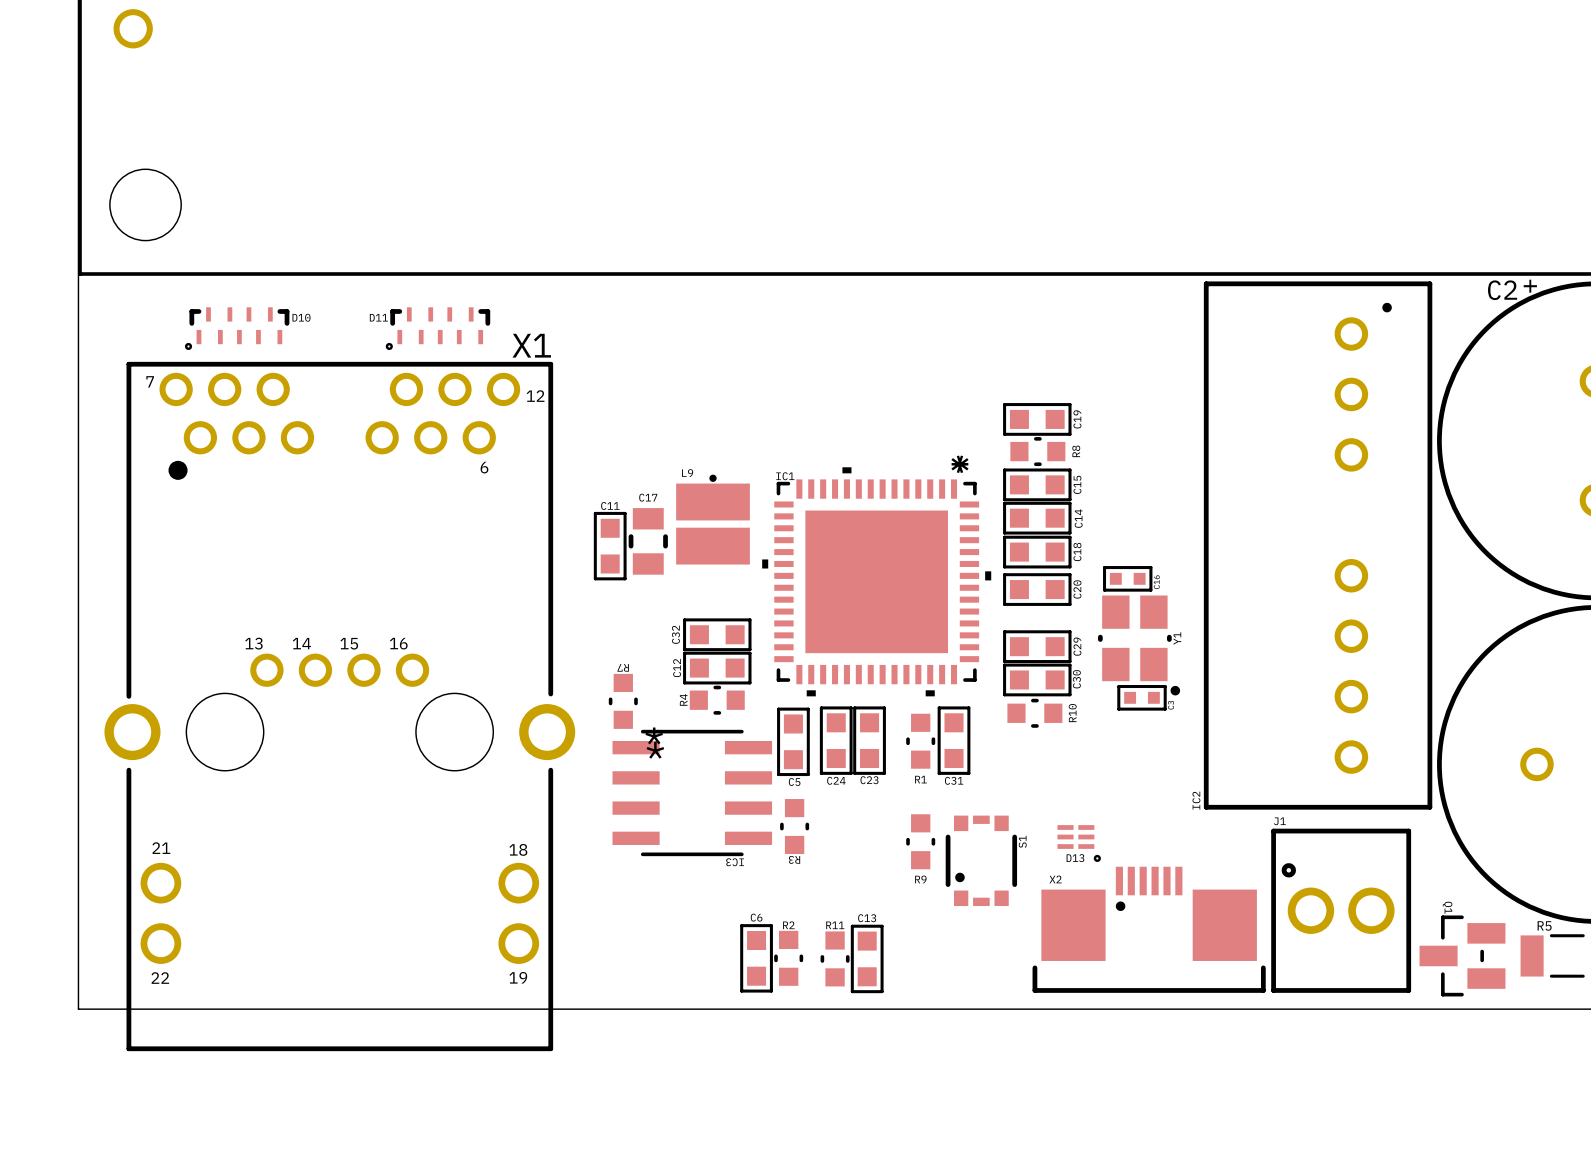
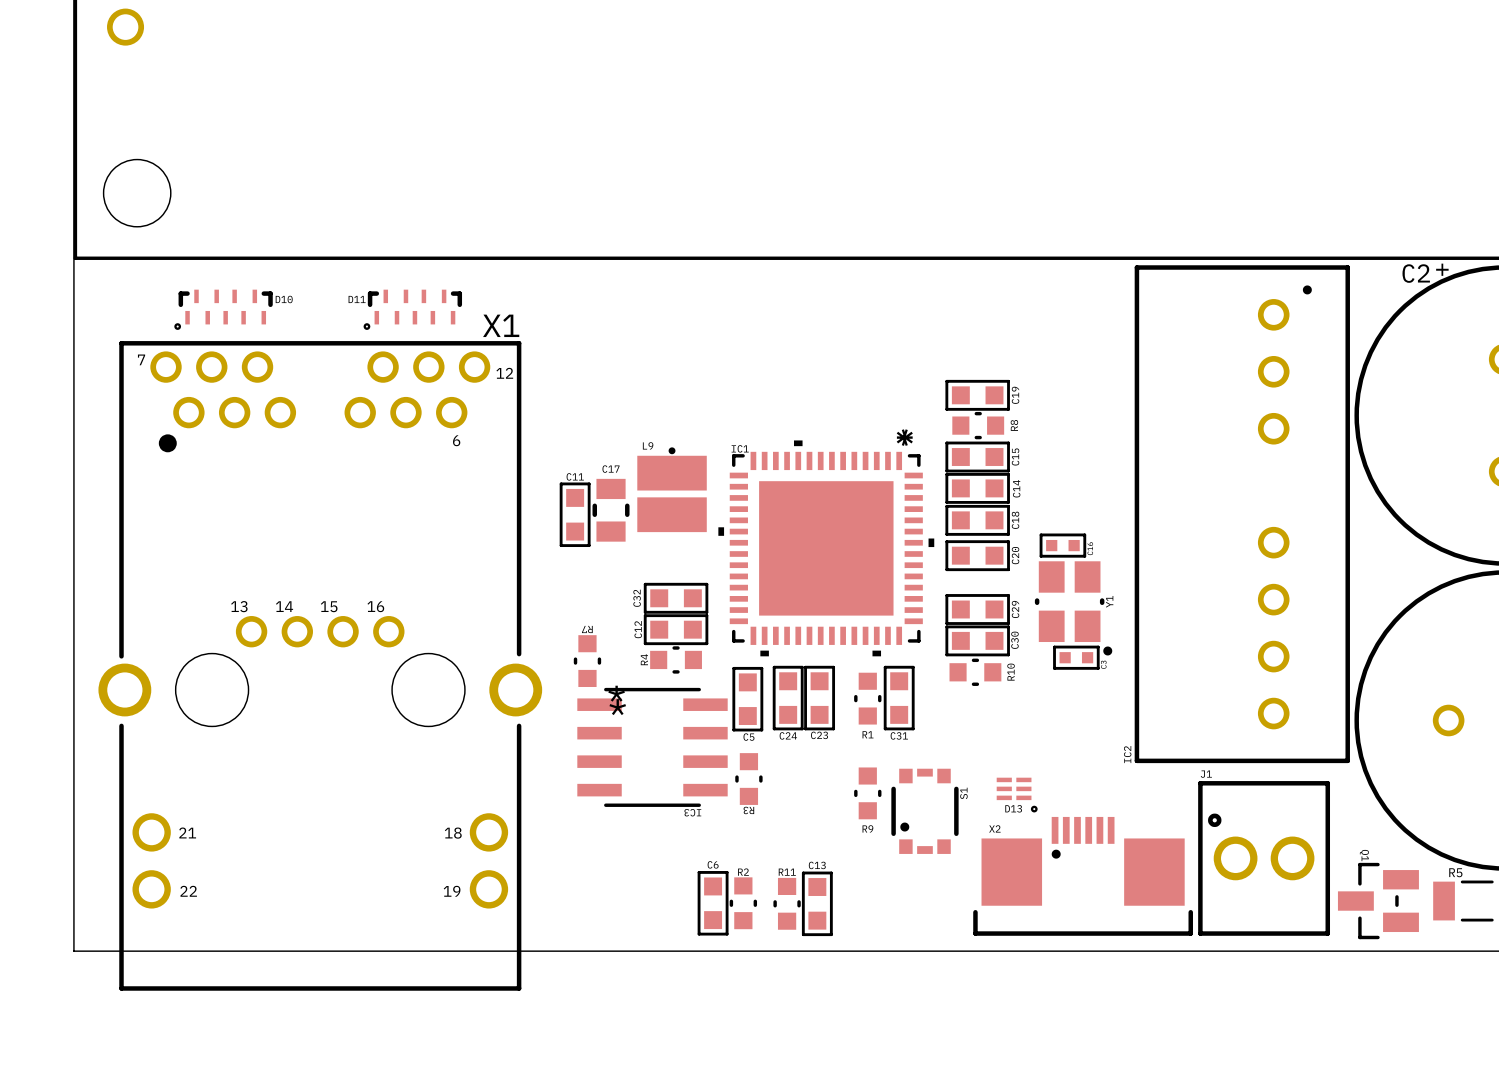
X1 text position: 21 (161, 848) -> 21 (187, 832)
X1 text position: 18 (518, 849) -> 18 (453, 833)
X1 text position: 19 (518, 977) -> 19 (452, 891)
X1 text position: 22 (160, 978) -> 22 (188, 891)

